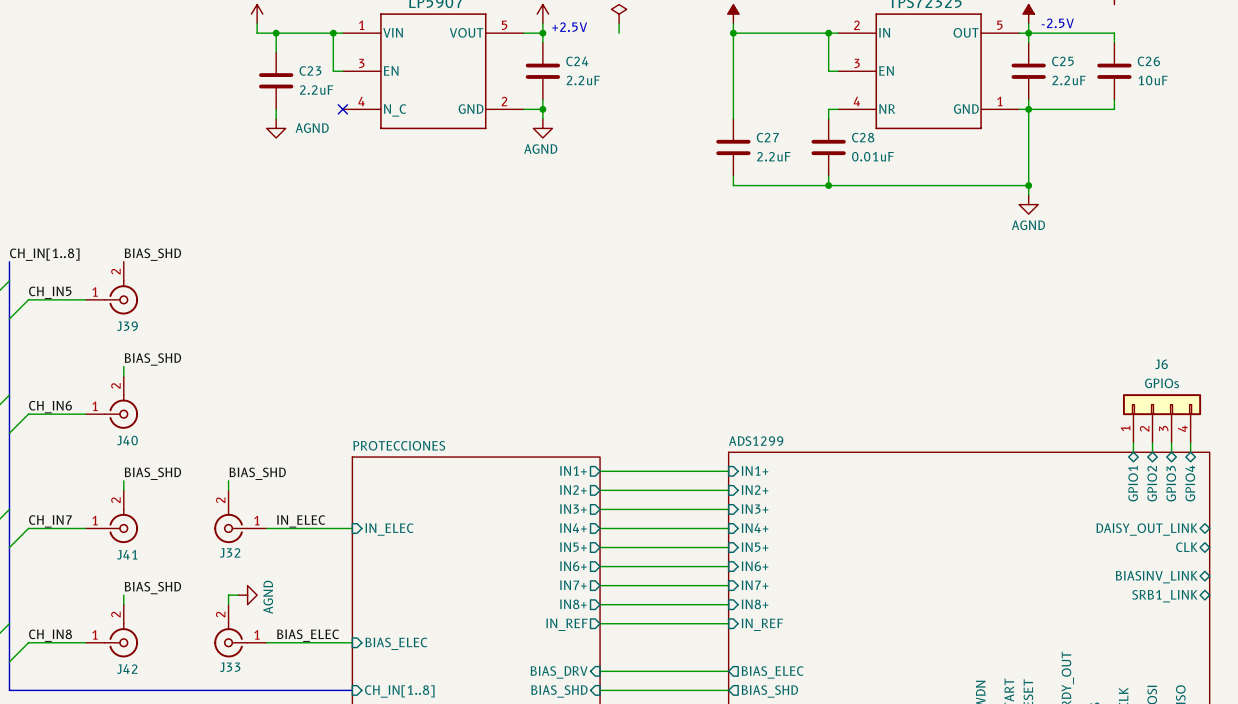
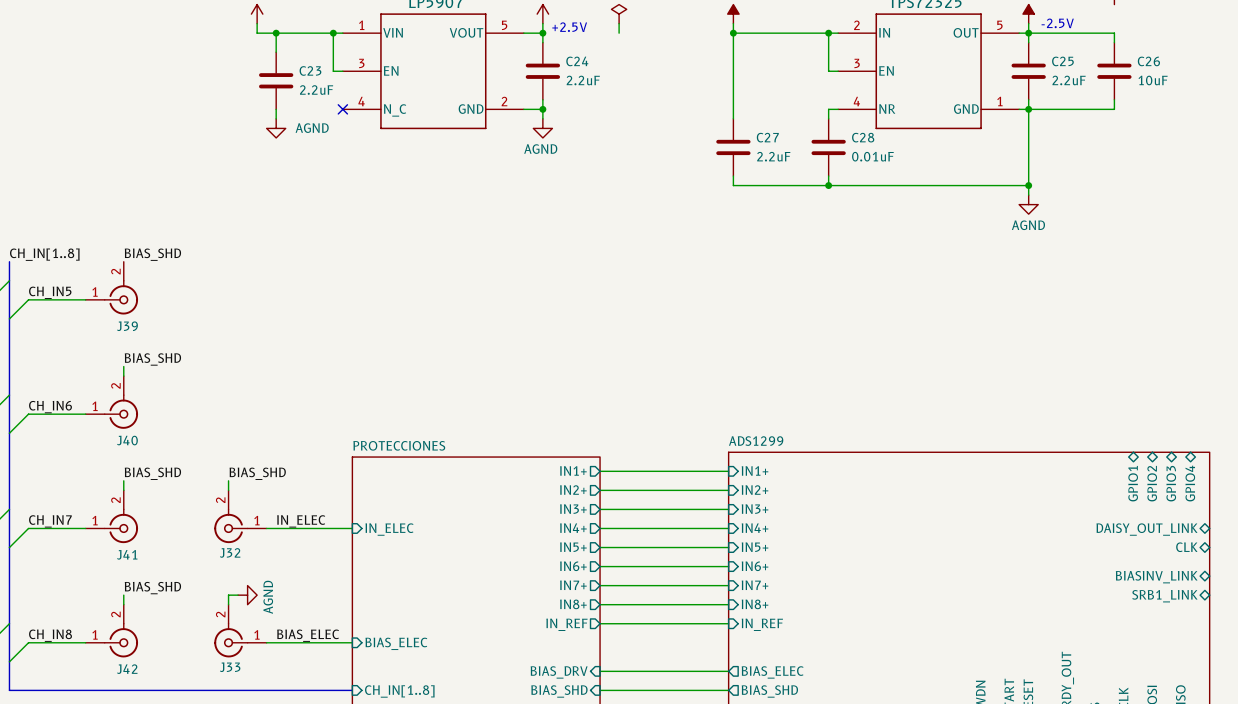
J6: GPIOs (1162, 418) -> none
wire: (1133, 442) (1133, 452) -> none
wire: (1152, 442) (1152, 452) -> none
wire: (1171, 442) (1171, 452) -> none
wire: (1190, 442) (1190, 452) -> none

